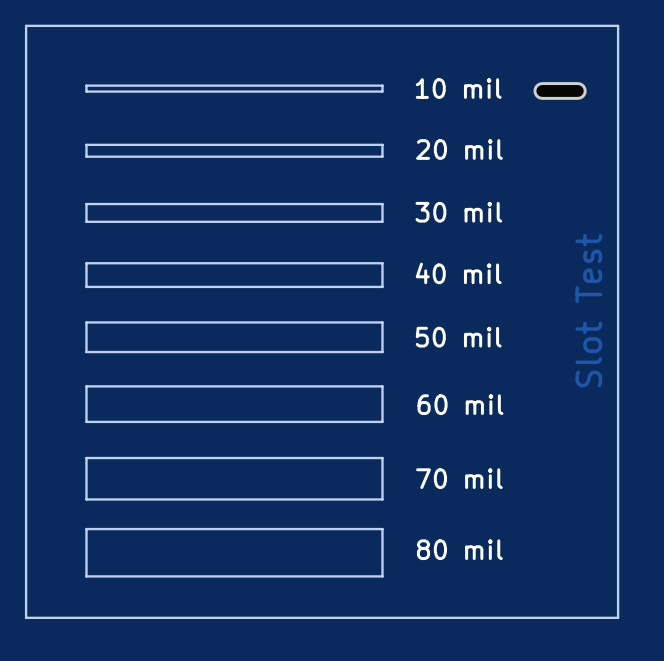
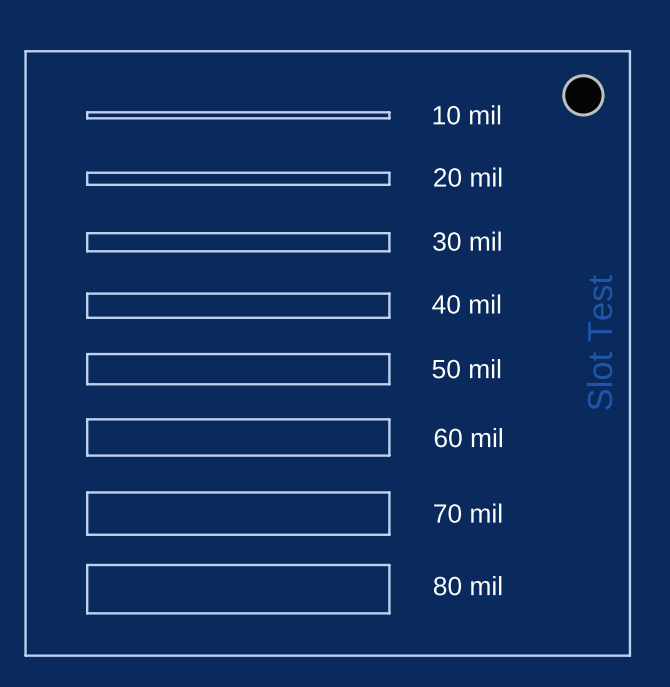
via: none -> (583, 95)
part: (560, 90) -> none

